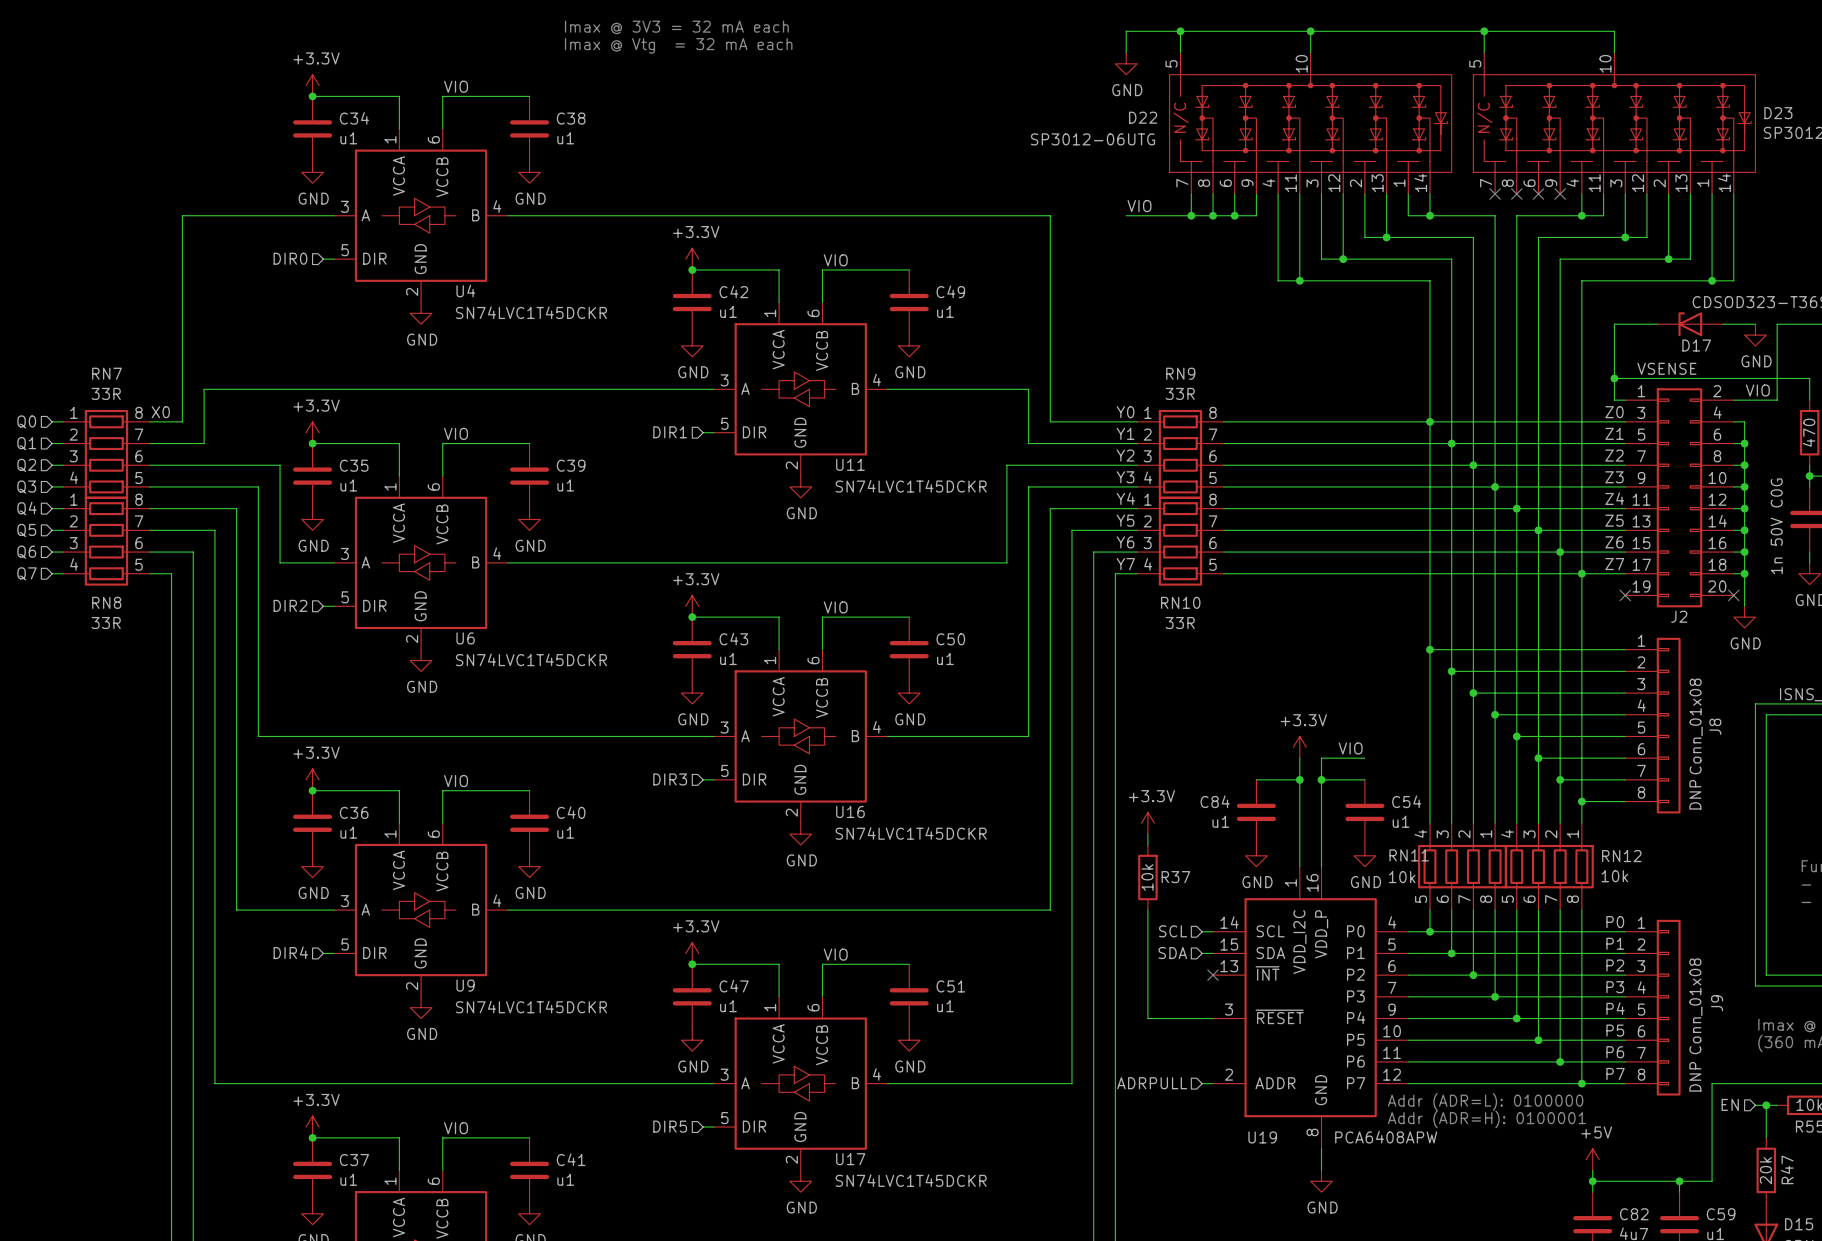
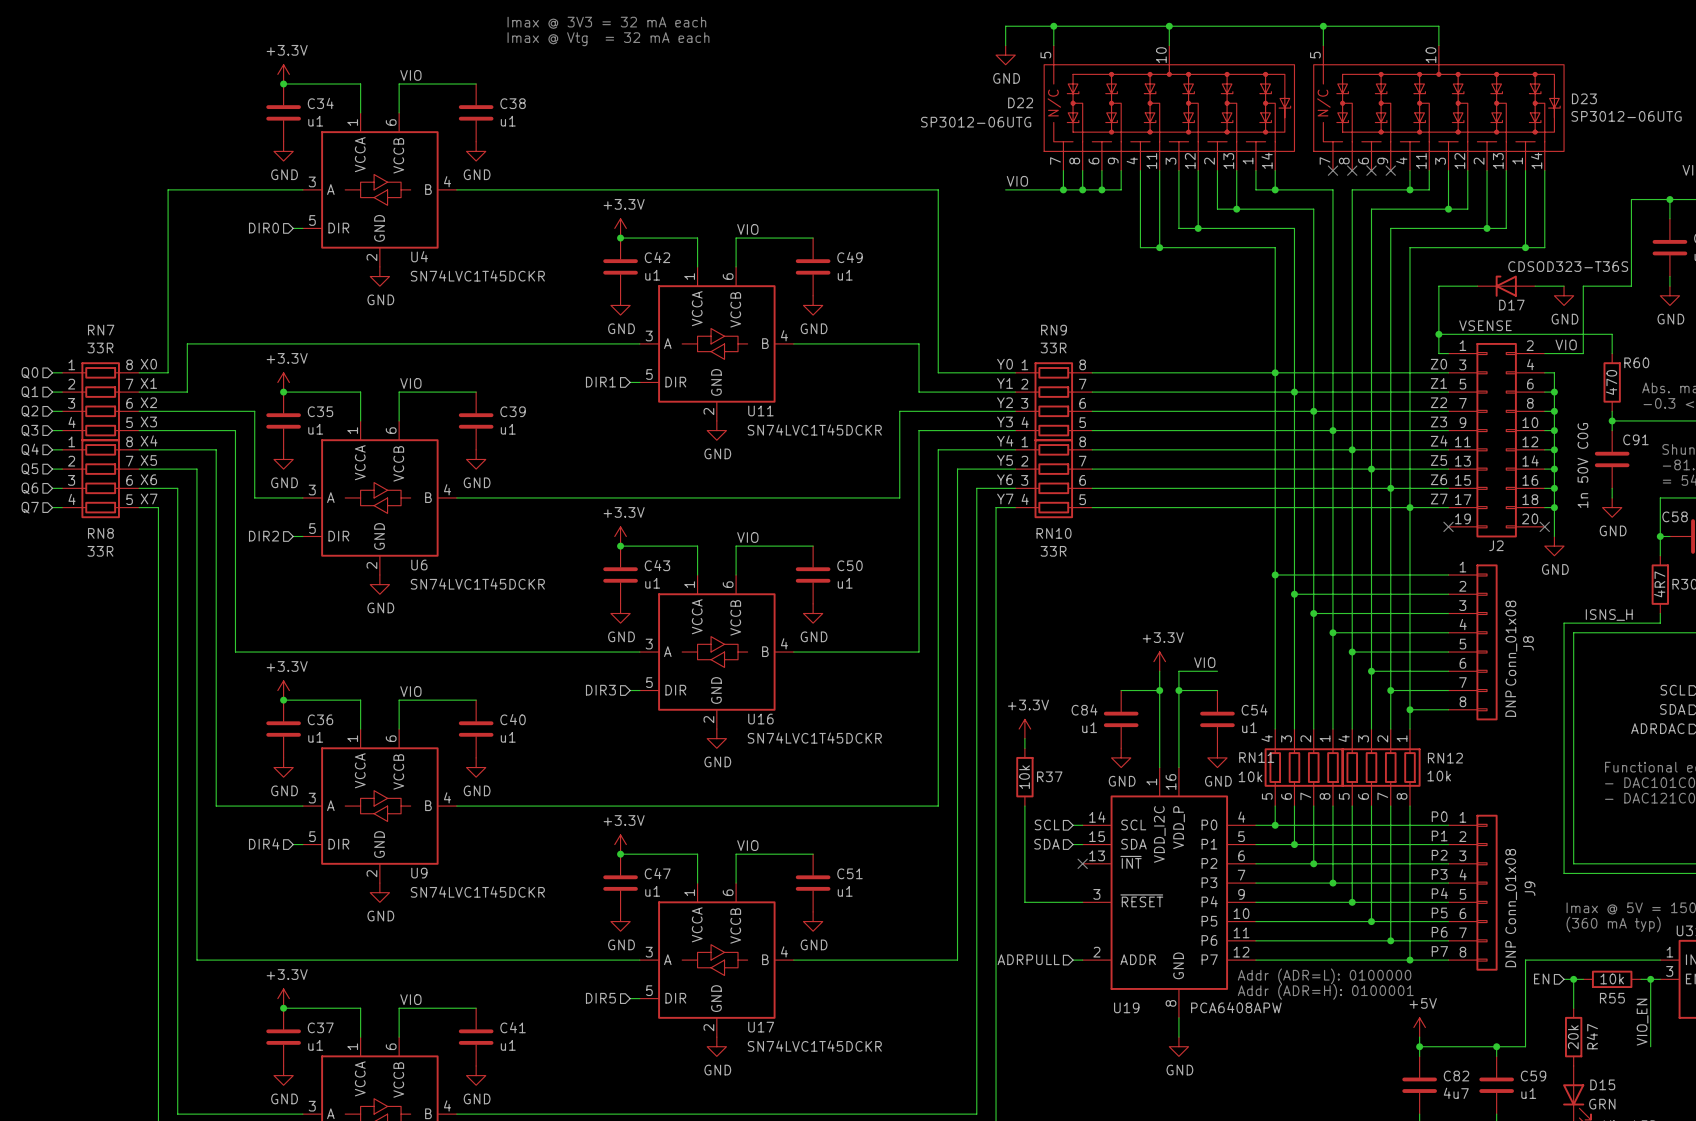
label: none -> X1 (148, 383)
label: none -> X2 (148, 402)
label: none -> X3 (148, 421)
label: none -> X4 (149, 441)
label: none -> X5 (148, 460)
label: none -> X6 (148, 479)
label: none -> X7 (149, 499)

